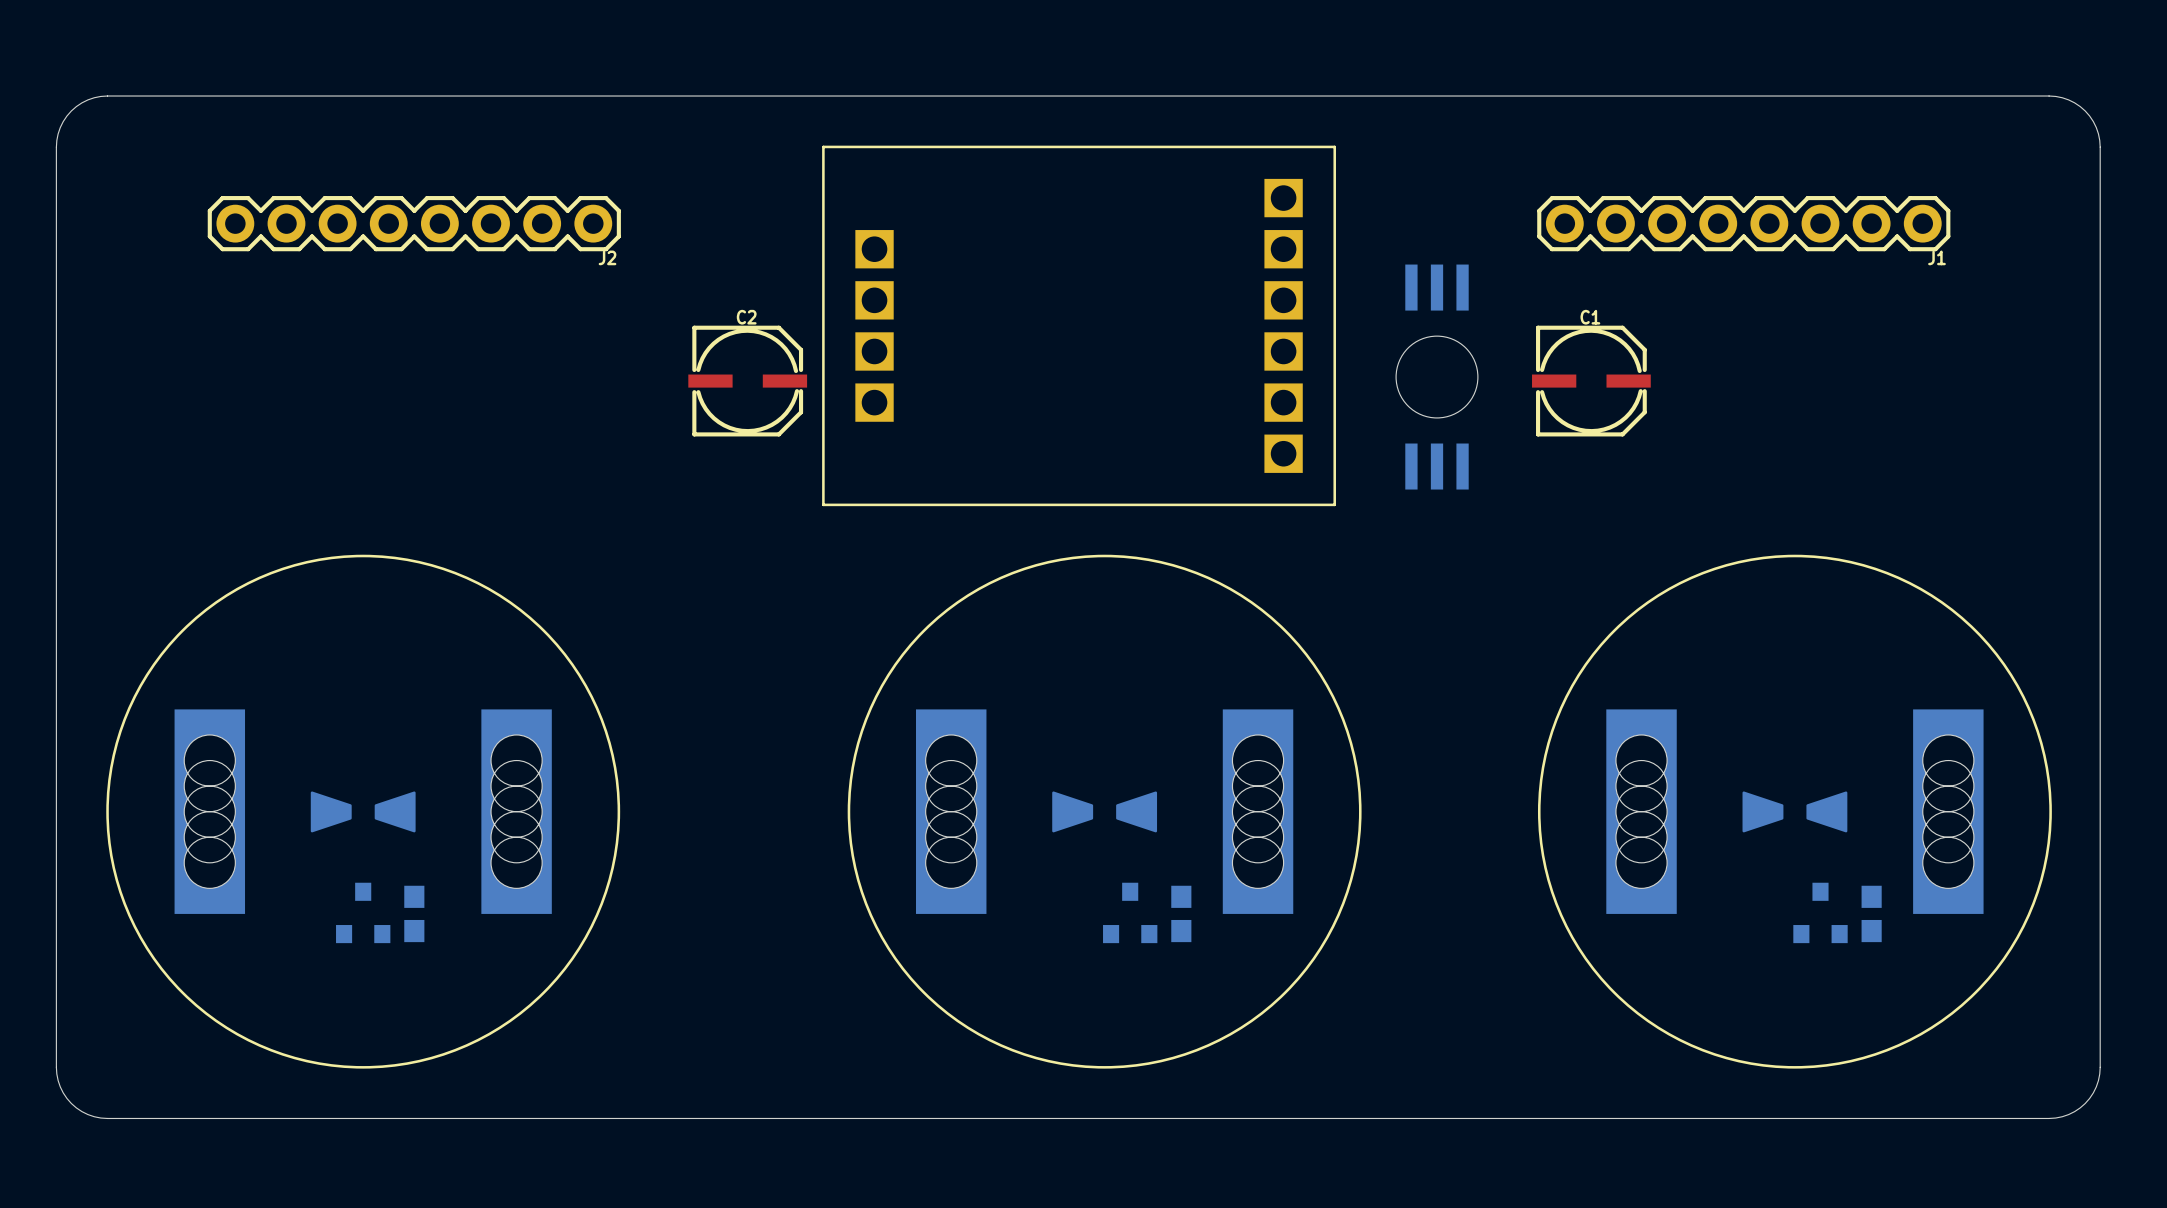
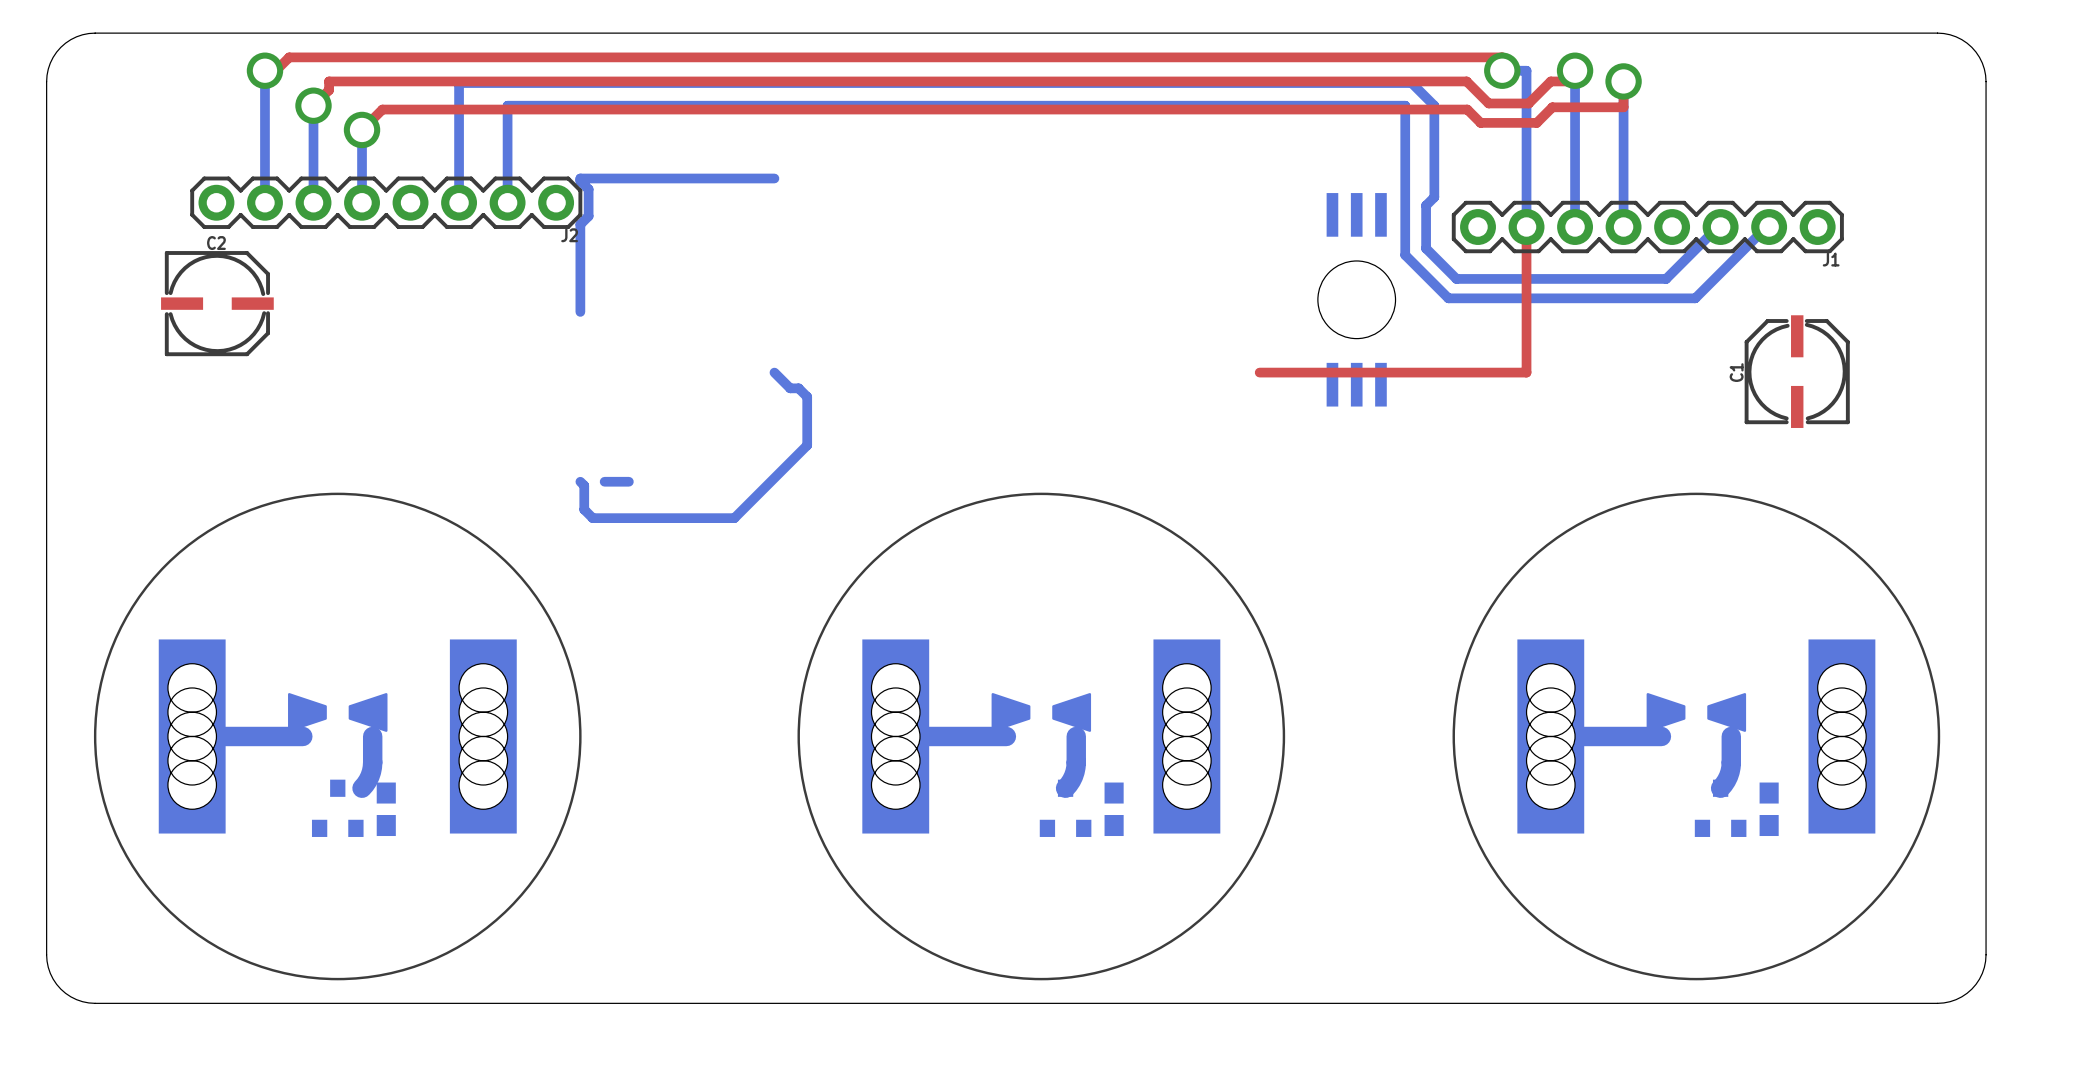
bottom track: none -> (264, 70) (264, 202)
top track: none -> (264, 70) (275, 70) (289, 57) (1502, 57) (1502, 70)
via: none -> (264, 70)
bottom track: none -> (1502, 70) (1526, 70) (1526, 227)
via: none -> (1502, 70)
bottom track: none -> (1575, 70) (1575, 227)
top track: none -> (1575, 70) (1575, 81) (1550, 81) (1528, 103) (1488, 103) (1466, 81) (329, 81) (329, 90) (313, 105)
via: none -> (1575, 70)
bottom track: none -> (1623, 81) (1623, 227)
top track: none -> (1623, 81) (1623, 107) (1552, 107) (1536, 122) (1480, 122) (1467, 109) (382, 109) (362, 129)
via: none -> (1623, 81)
bottom track: none -> (313, 105) (313, 202)
via: none -> (313, 105)
bottom track: none -> (362, 129) (362, 202)
via: none -> (362, 129)
J2 position: (414, 223) -> (386, 202)
J1 position: (1743, 223) -> (1647, 227)
bottom track: none -> (774, 178) (580, 178) (580, 181) (588, 189) (588, 216) (580, 224) (580, 311)
bottom track: none -> (459, 202) (459, 84) (460, 83) (1411, 83) (1434, 105) (1434, 197) (1426, 205) (1426, 248) (1456, 278) (1666, 278) (1718, 227) (1720, 227)
bottom track: none -> (507, 202) (507, 105) (1405, 105) (1405, 255) (1448, 298) (1695, 298) (1766, 227) (1769, 227)
top track: none -> (1526, 227) (1526, 372) (1259, 372)
part: (1079, 325) -> none
C2 position: (747, 381) -> (217, 303)
C1 rotation: 0° (1591, 381) -> 90° counterclockwise (1797, 371)
C1 position: (1591, 381) -> (1797, 371)
bottom track: none -> (774, 372) (790, 388) (798, 388) (807, 396) (807, 445) (734, 518) (592, 518) (584, 509) (584, 485) (580, 481)
bottom track: none -> (604, 481) (628, 481)
part position: (363, 811) -> (337, 736)
part position: (1104, 811) -> (1041, 736)
part position: (1794, 811) -> (1696, 736)
bottom track: none -> (192, 736) (302, 736)
bottom track: none -> (372, 736) (371, 771) (362, 788)
bottom track: none -> (895, 736) (1006, 736)
bottom track: none -> (1076, 736) (1075, 771) (1065, 788)
bottom track: none -> (1550, 736) (1661, 736)
bottom track: none -> (1731, 736) (1730, 771) (1720, 788)

